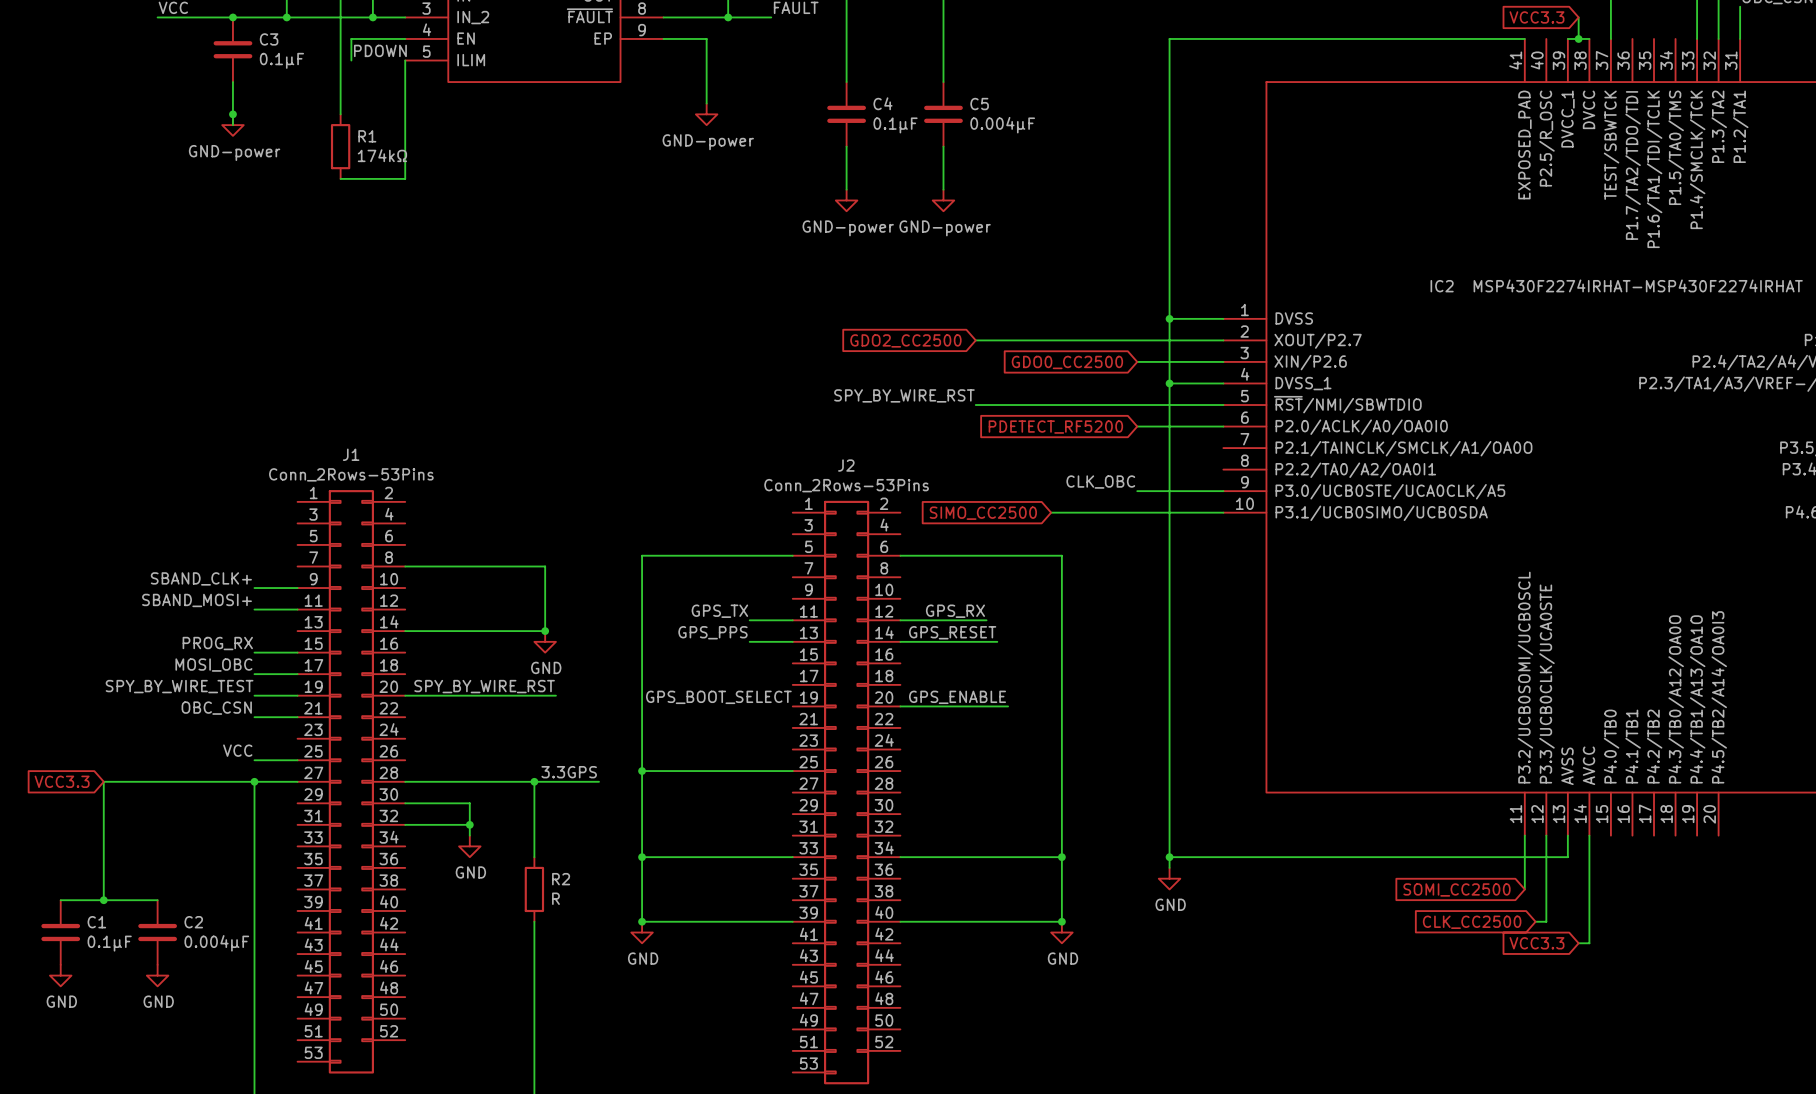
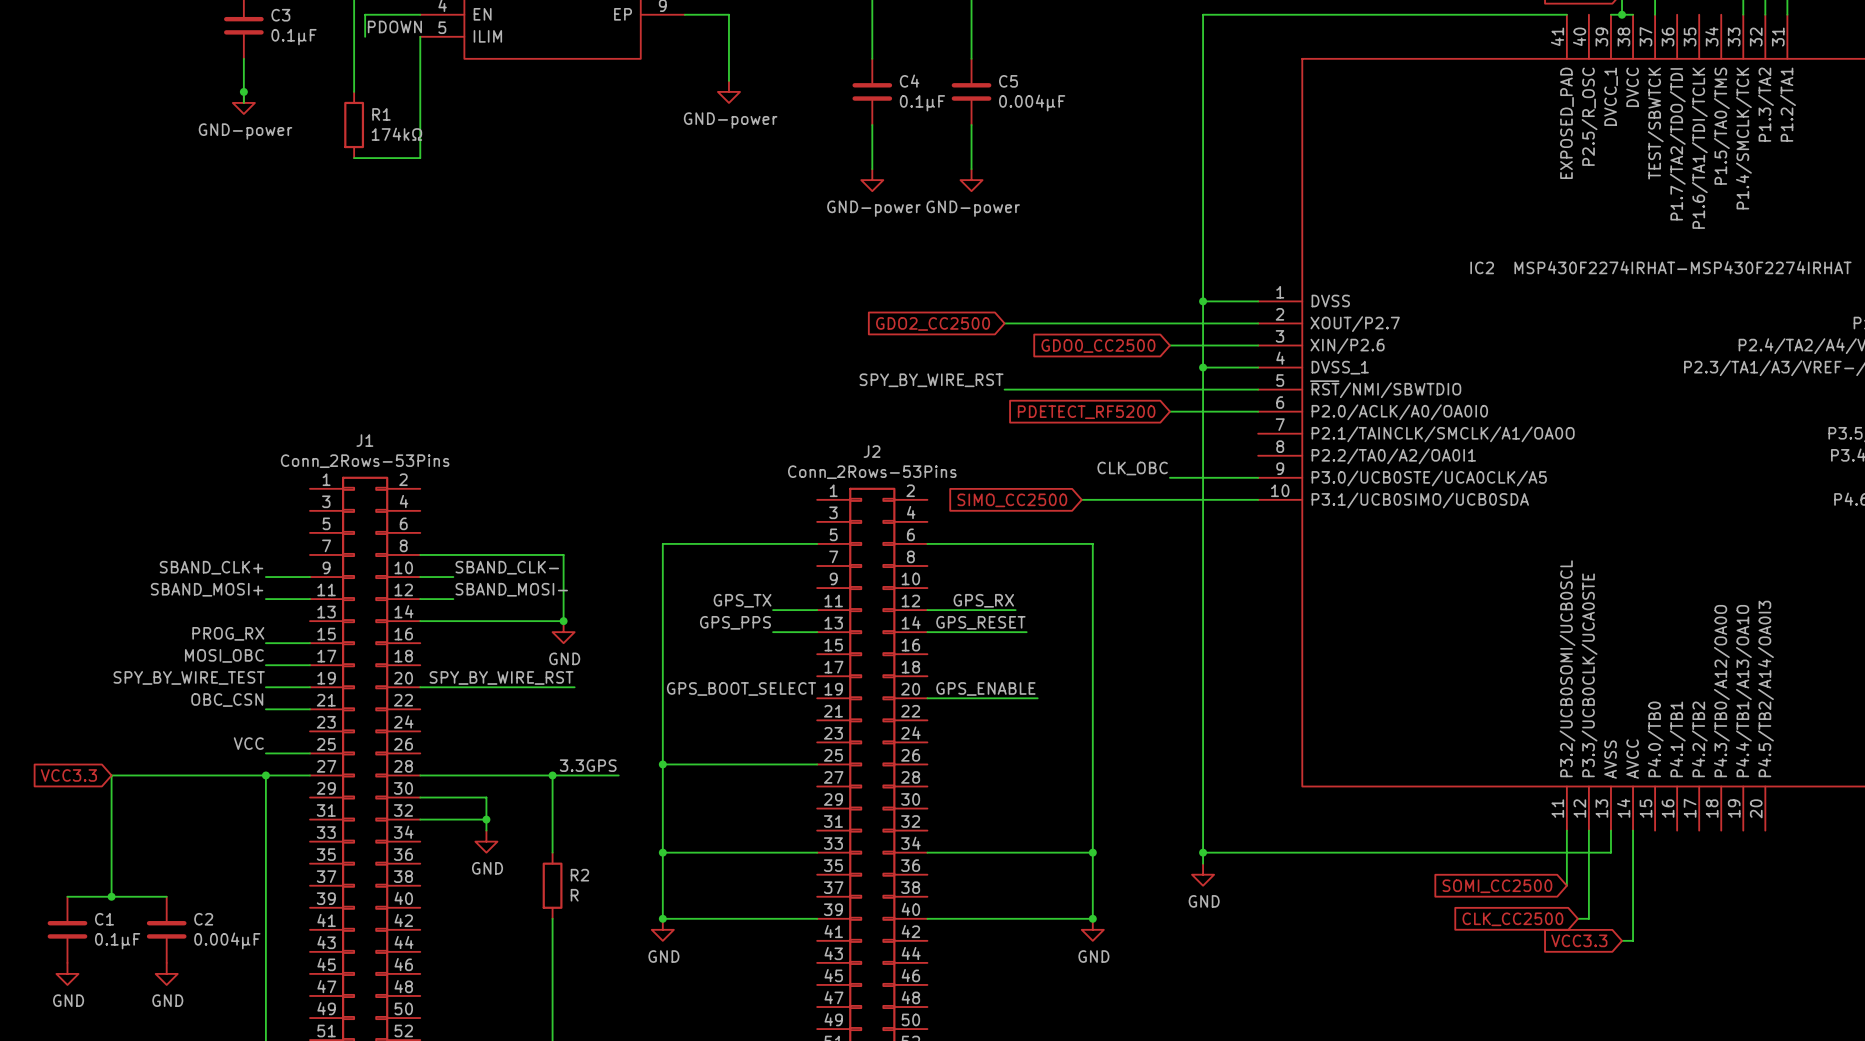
label: none -> SBAND_CLK- (507, 567)
wire: none -> (420, 577) (453, 577)
label: none -> SBAND_MOSI- (511, 589)
wire: none -> (420, 599) (453, 599)

